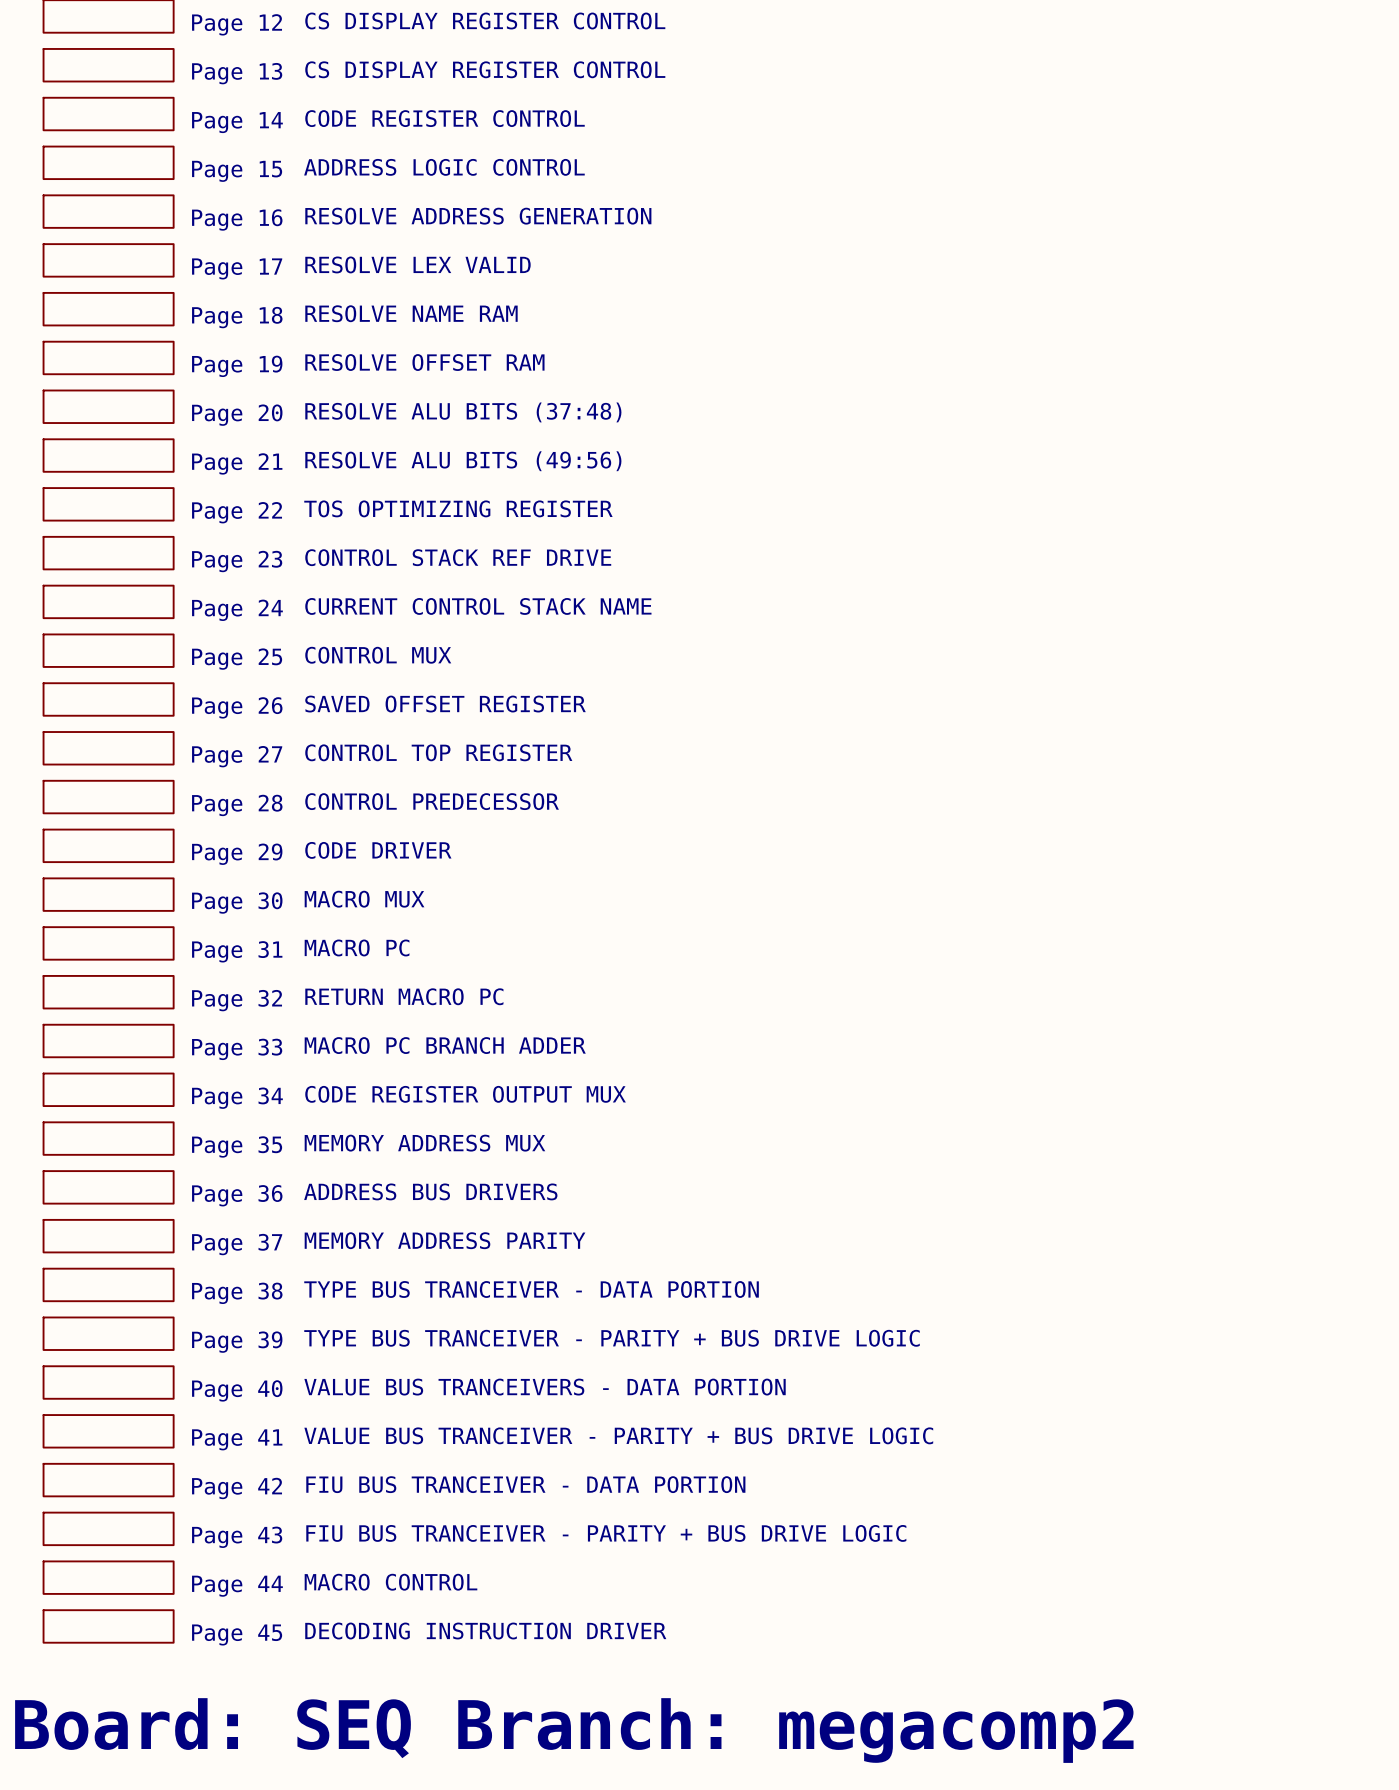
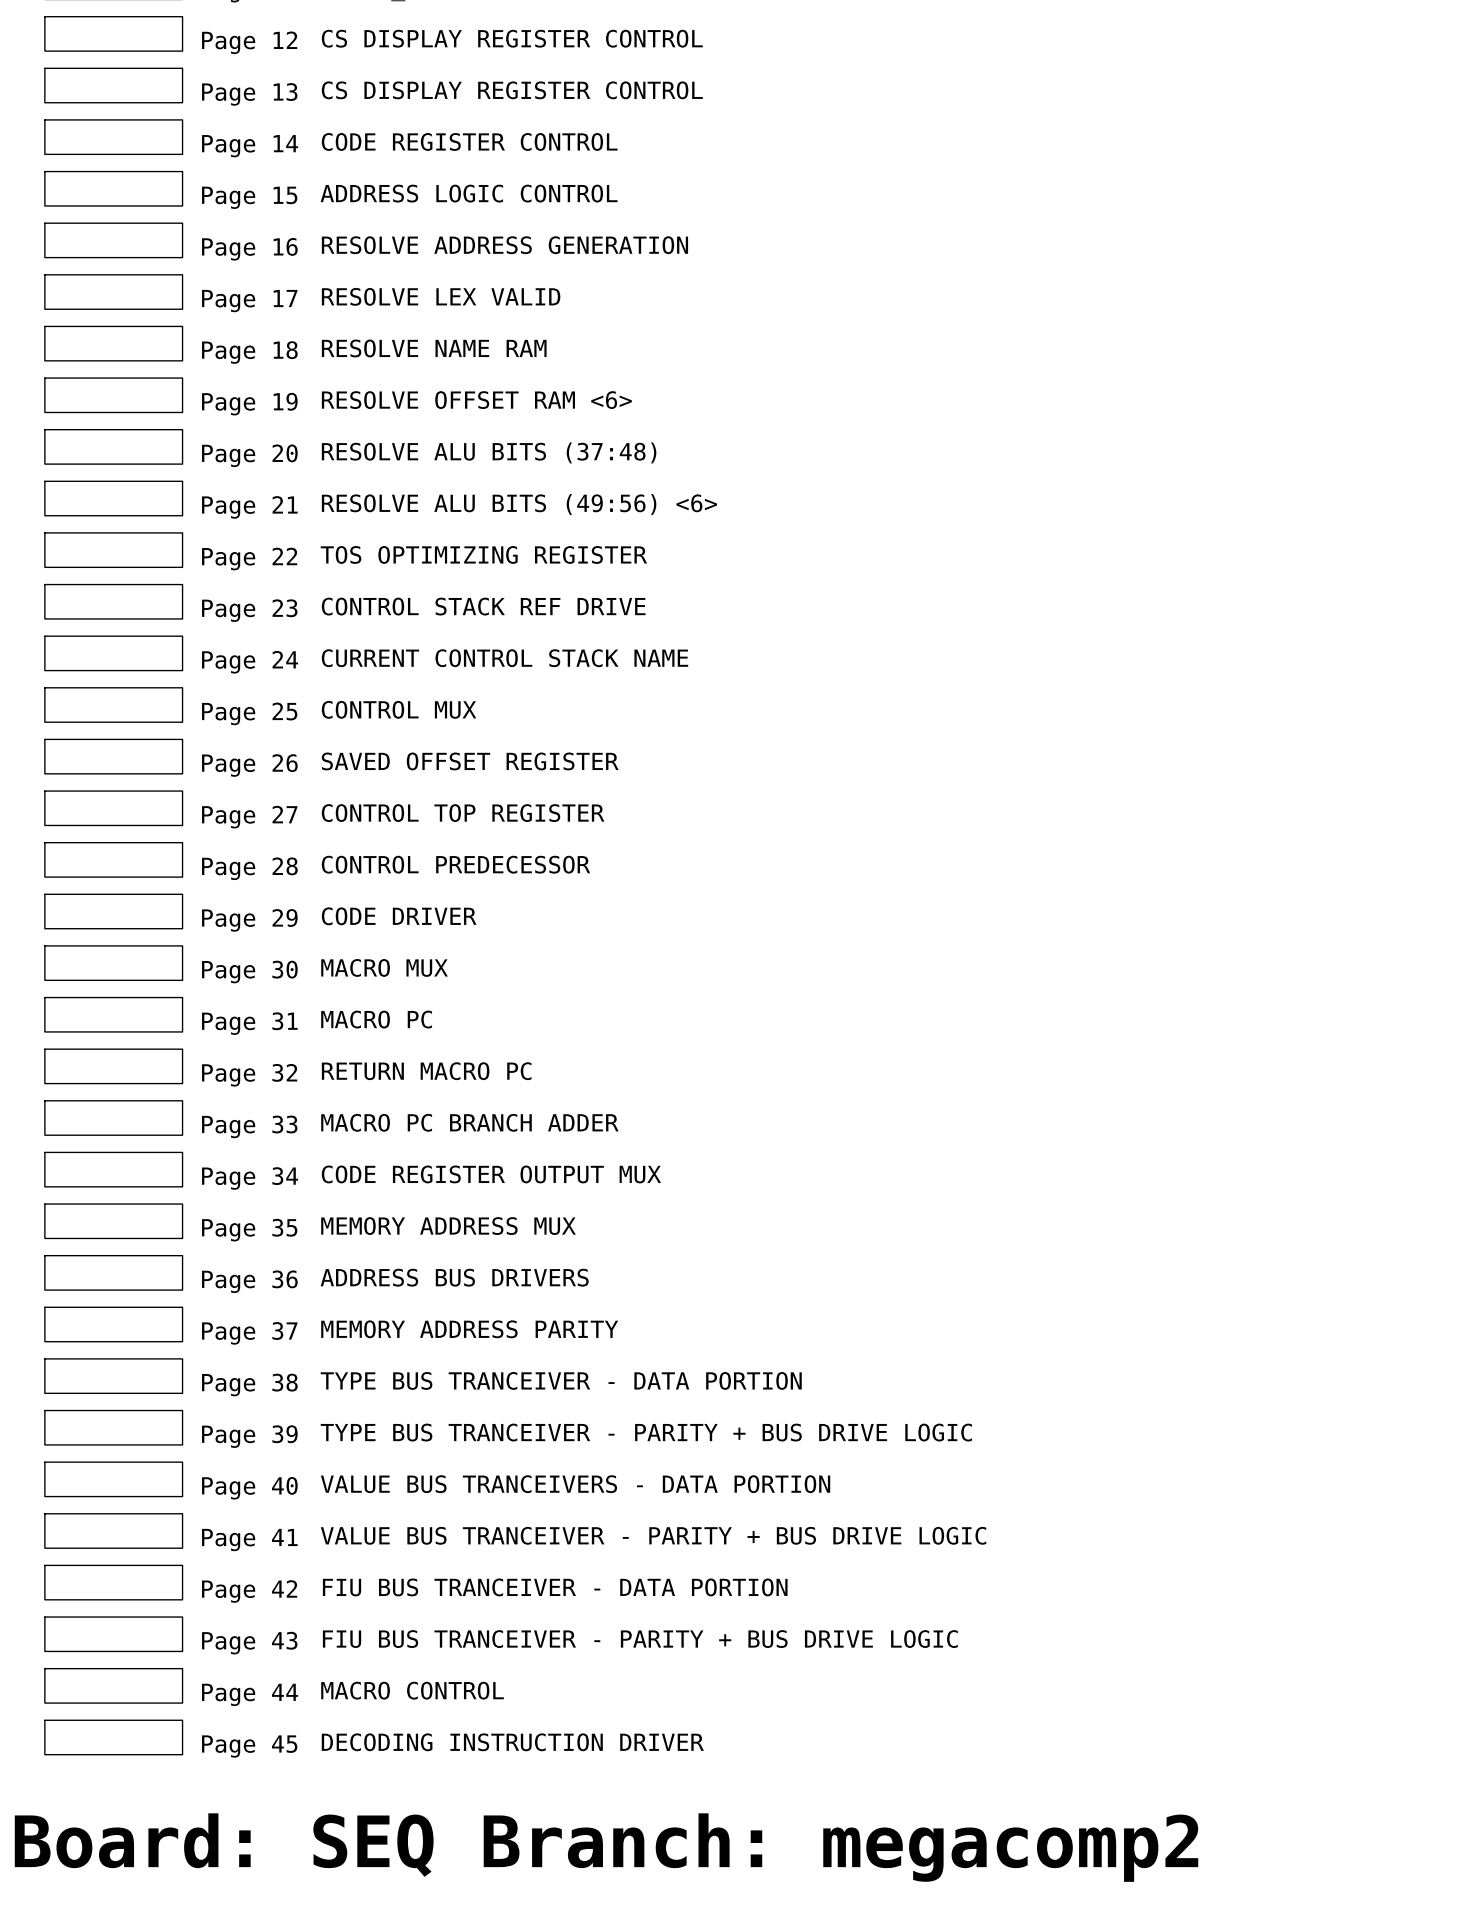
text: RESOLVE OFFSET RAM (424, 362) -> RESOLVE OFFSET RAM <6> (476, 400)
text: RESOLVE ALU BITS (49:56) (463, 461) -> RESOLVE ALU BITS (49:56) <6> (519, 504)

